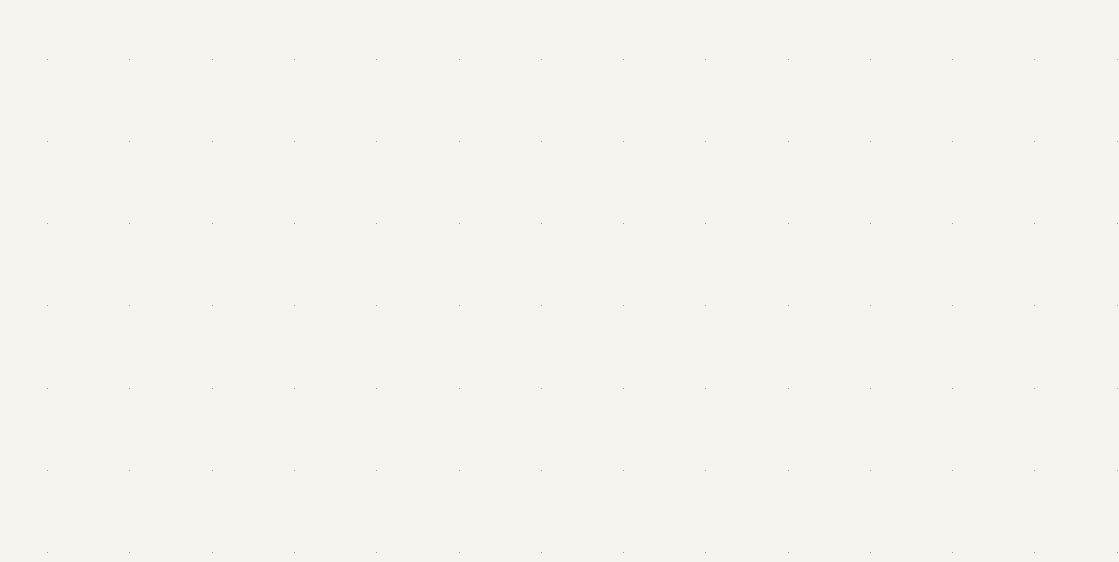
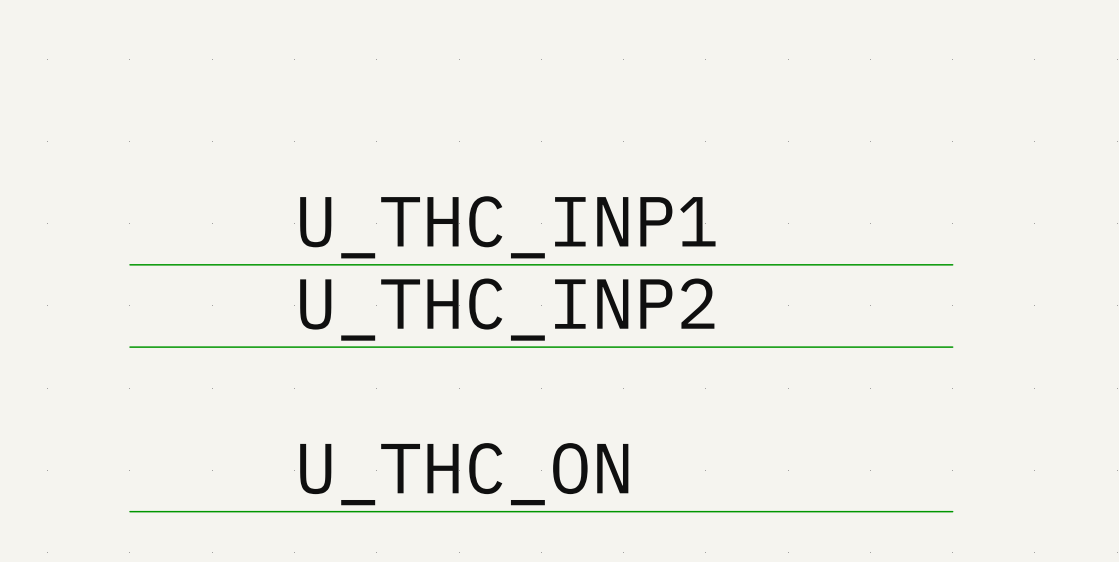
label: none -> U_THC_INP1 (507, 227)
wire: none -> (129, 264) (952, 264)
label: none -> U_THC_INP2 (507, 309)
wire: none -> (129, 347) (952, 347)
label: none -> U_THC_ON (464, 474)
wire: none -> (129, 511) (952, 511)

